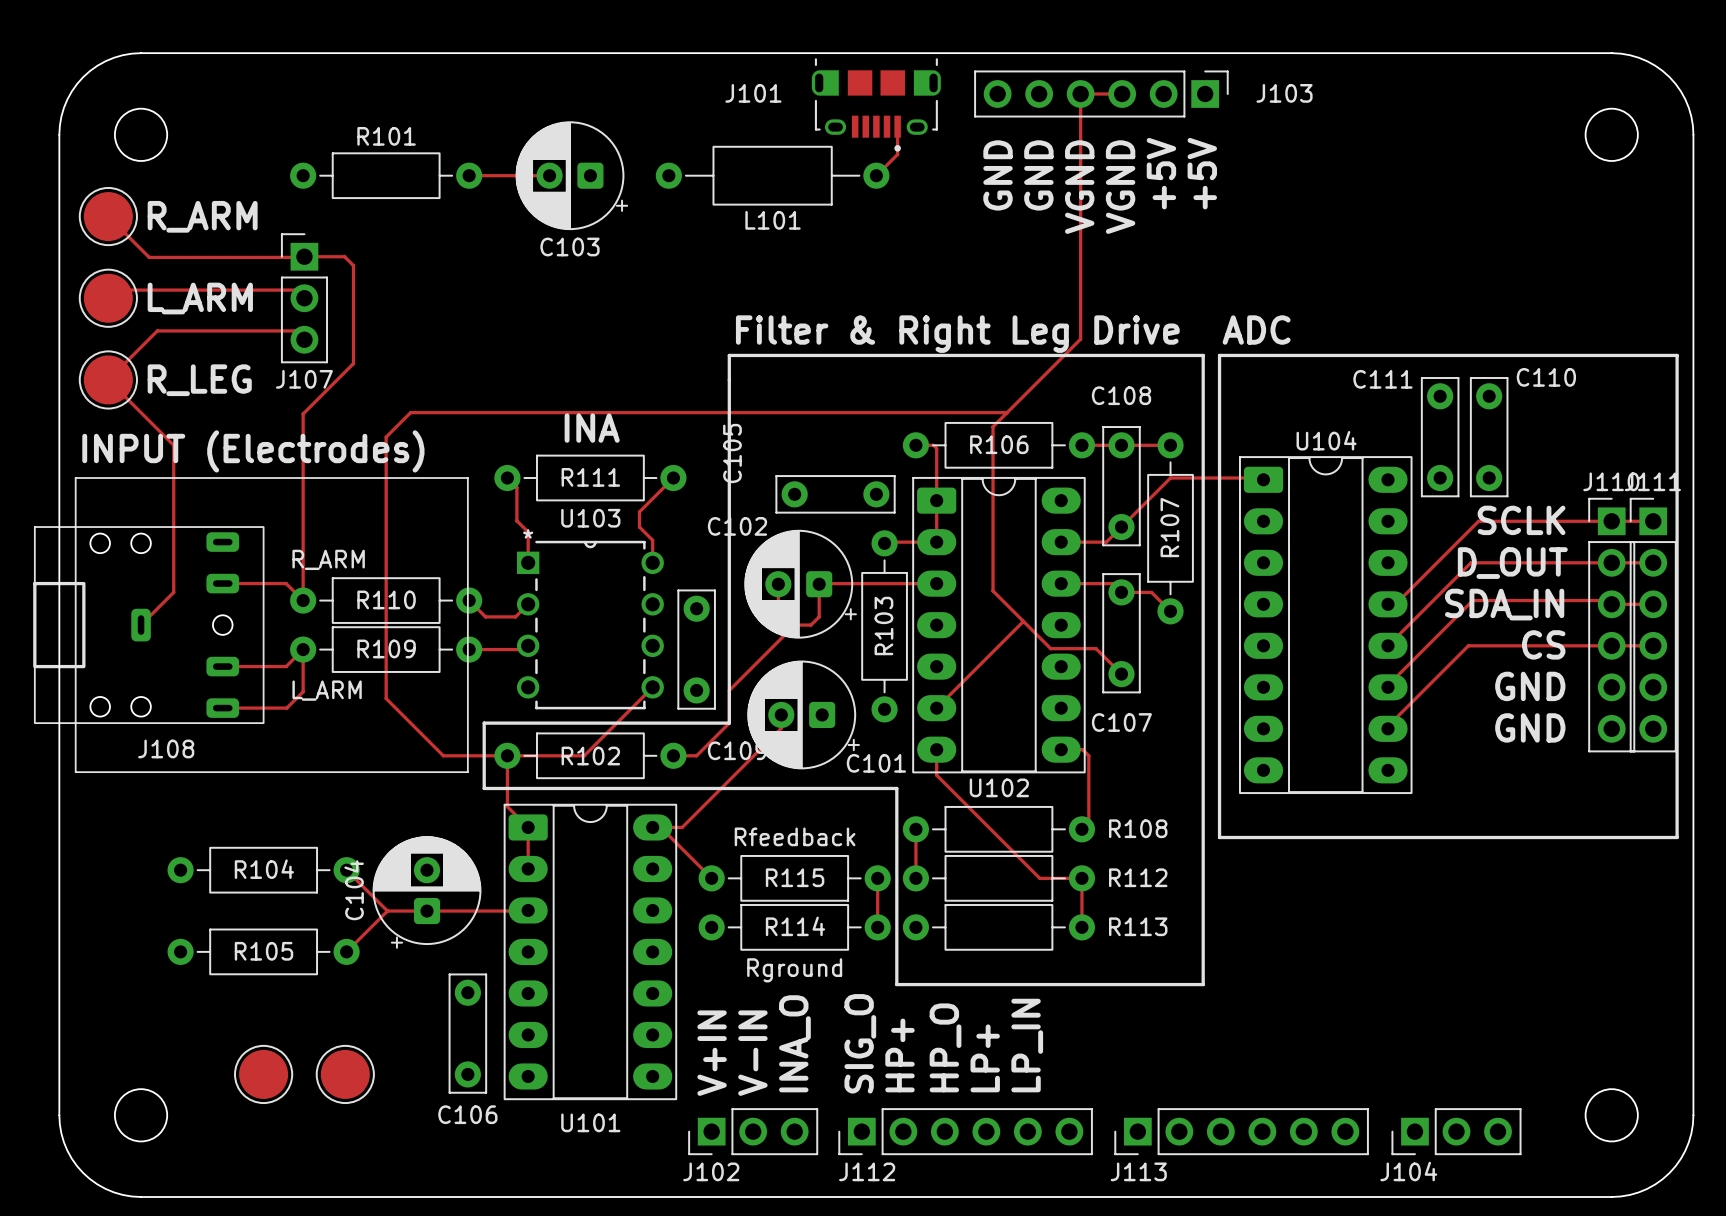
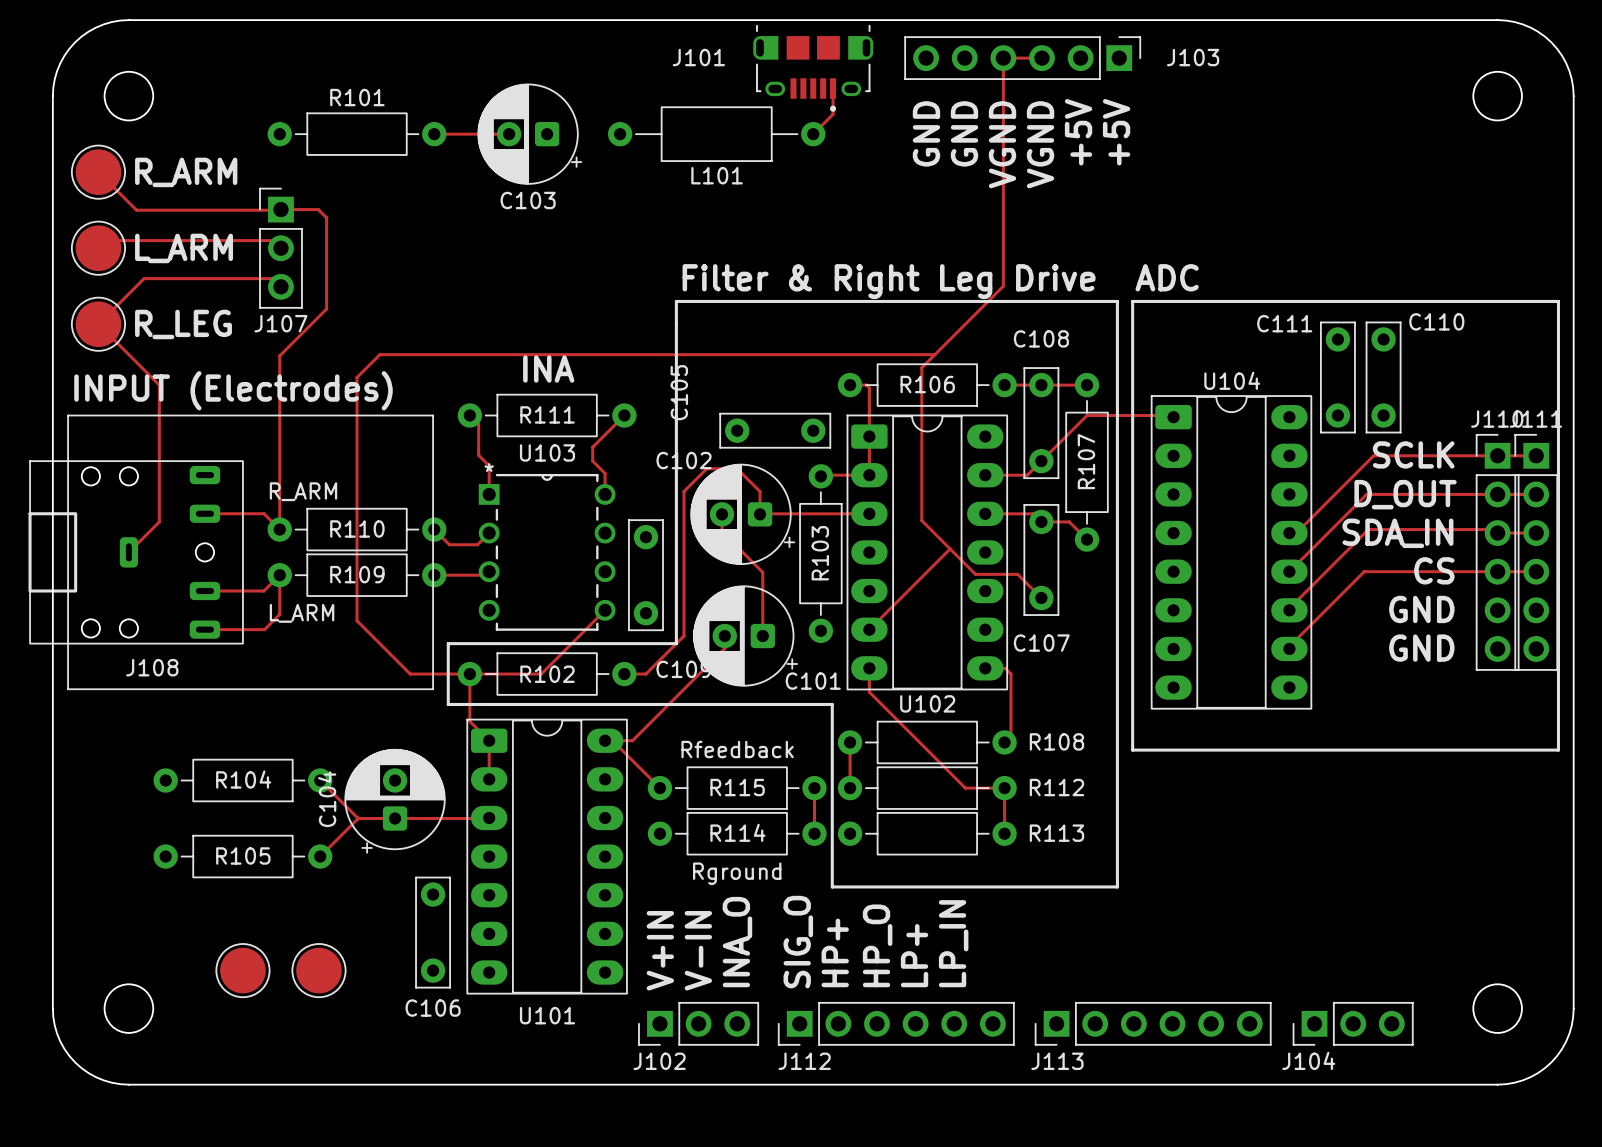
track: (819, 584) (819, 616) (811, 625) (794, 625) (729, 690) (729, 723) -> (760, 514) (760, 491) (737, 468) (706, 468) (683, 491) (683, 636) (676, 643)
track: none -> (722, 531) (762, 572) (762, 636)

